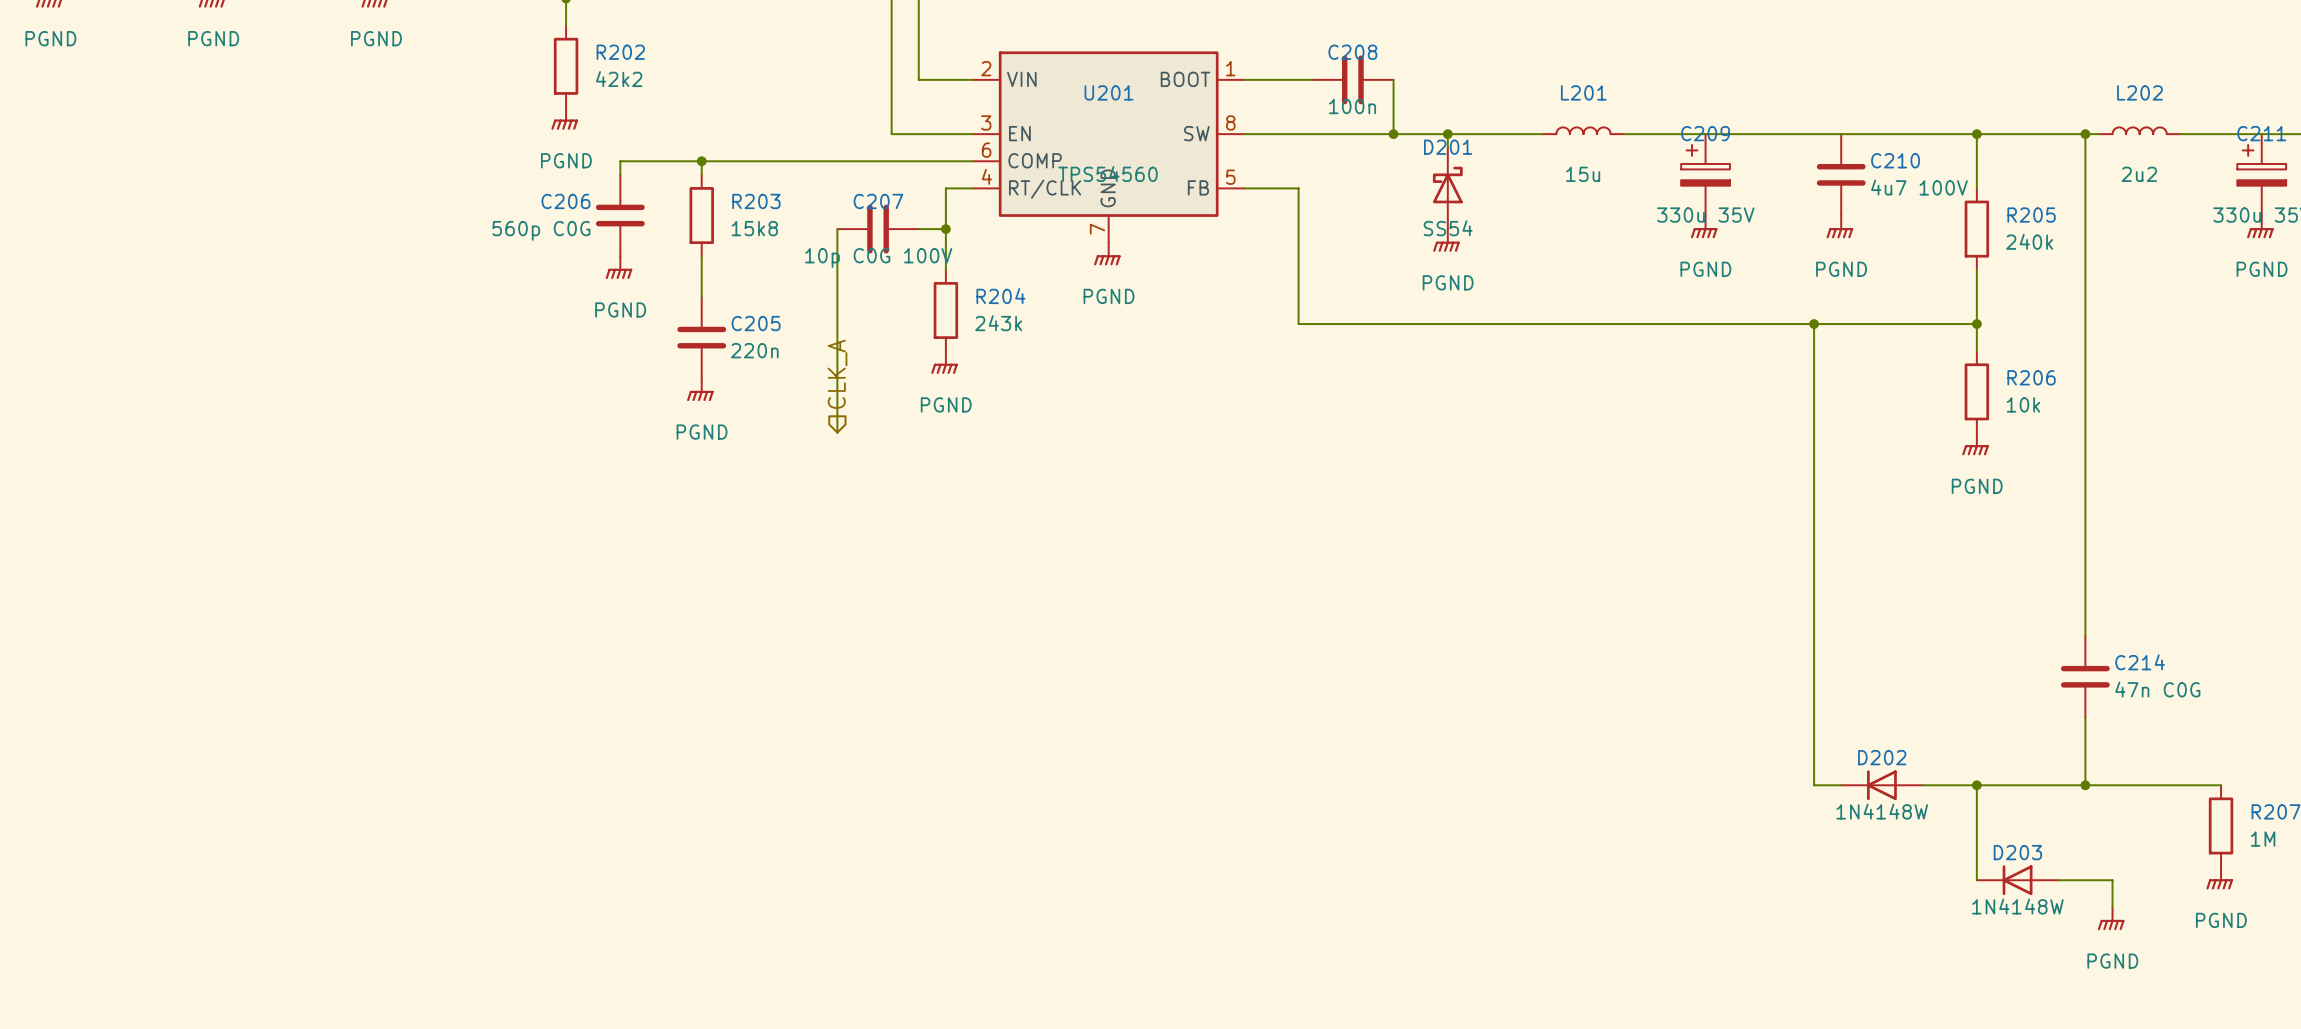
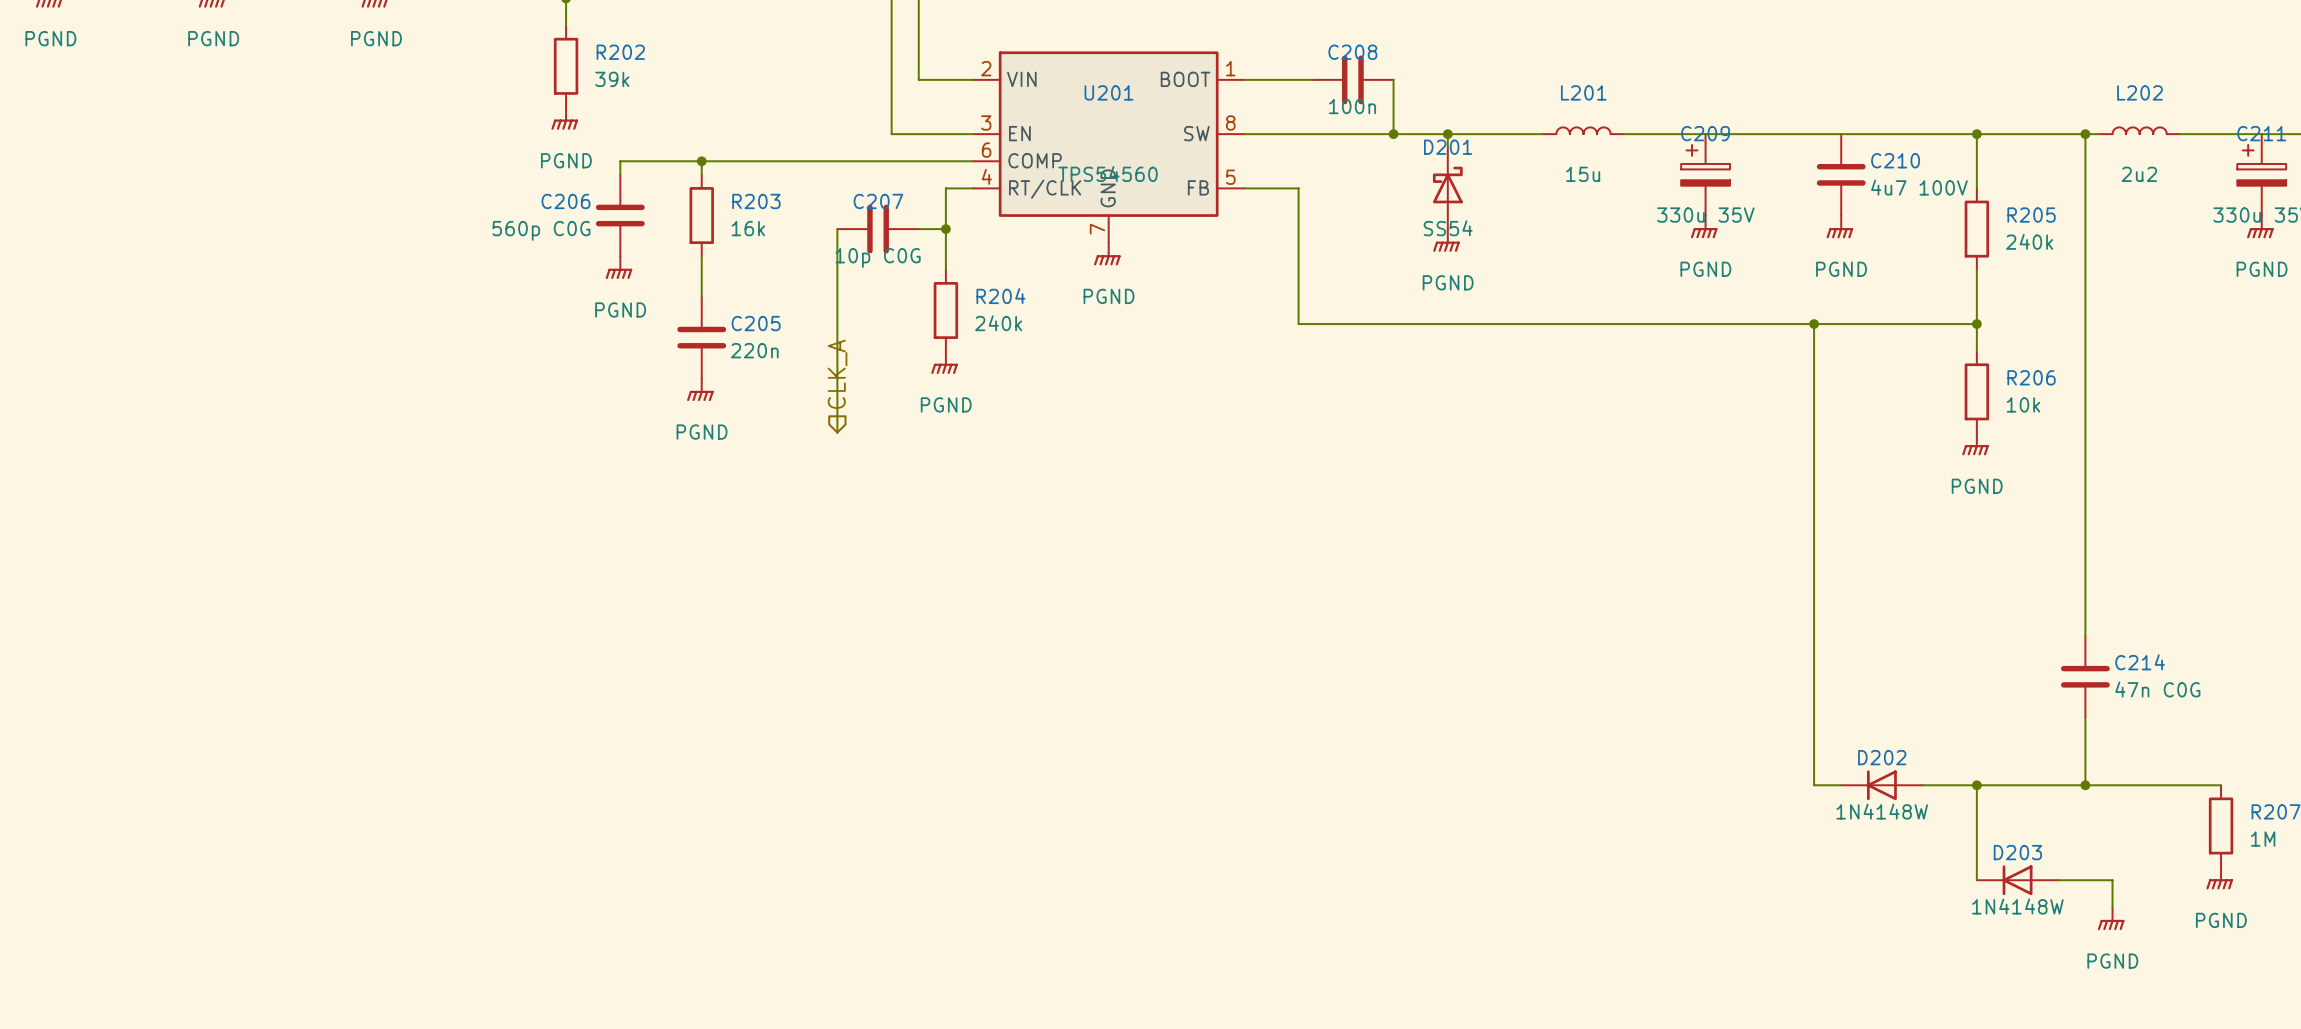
R202 value: 42k2 (619, 79) -> 39k (612, 79)
R203 value: 15k8 (754, 228) -> 16k (748, 228)
C207 value: 10p C0G 100V (878, 257) -> 10p C0G (878, 257)
R204 value: 243k (998, 323) -> 240k (998, 323)

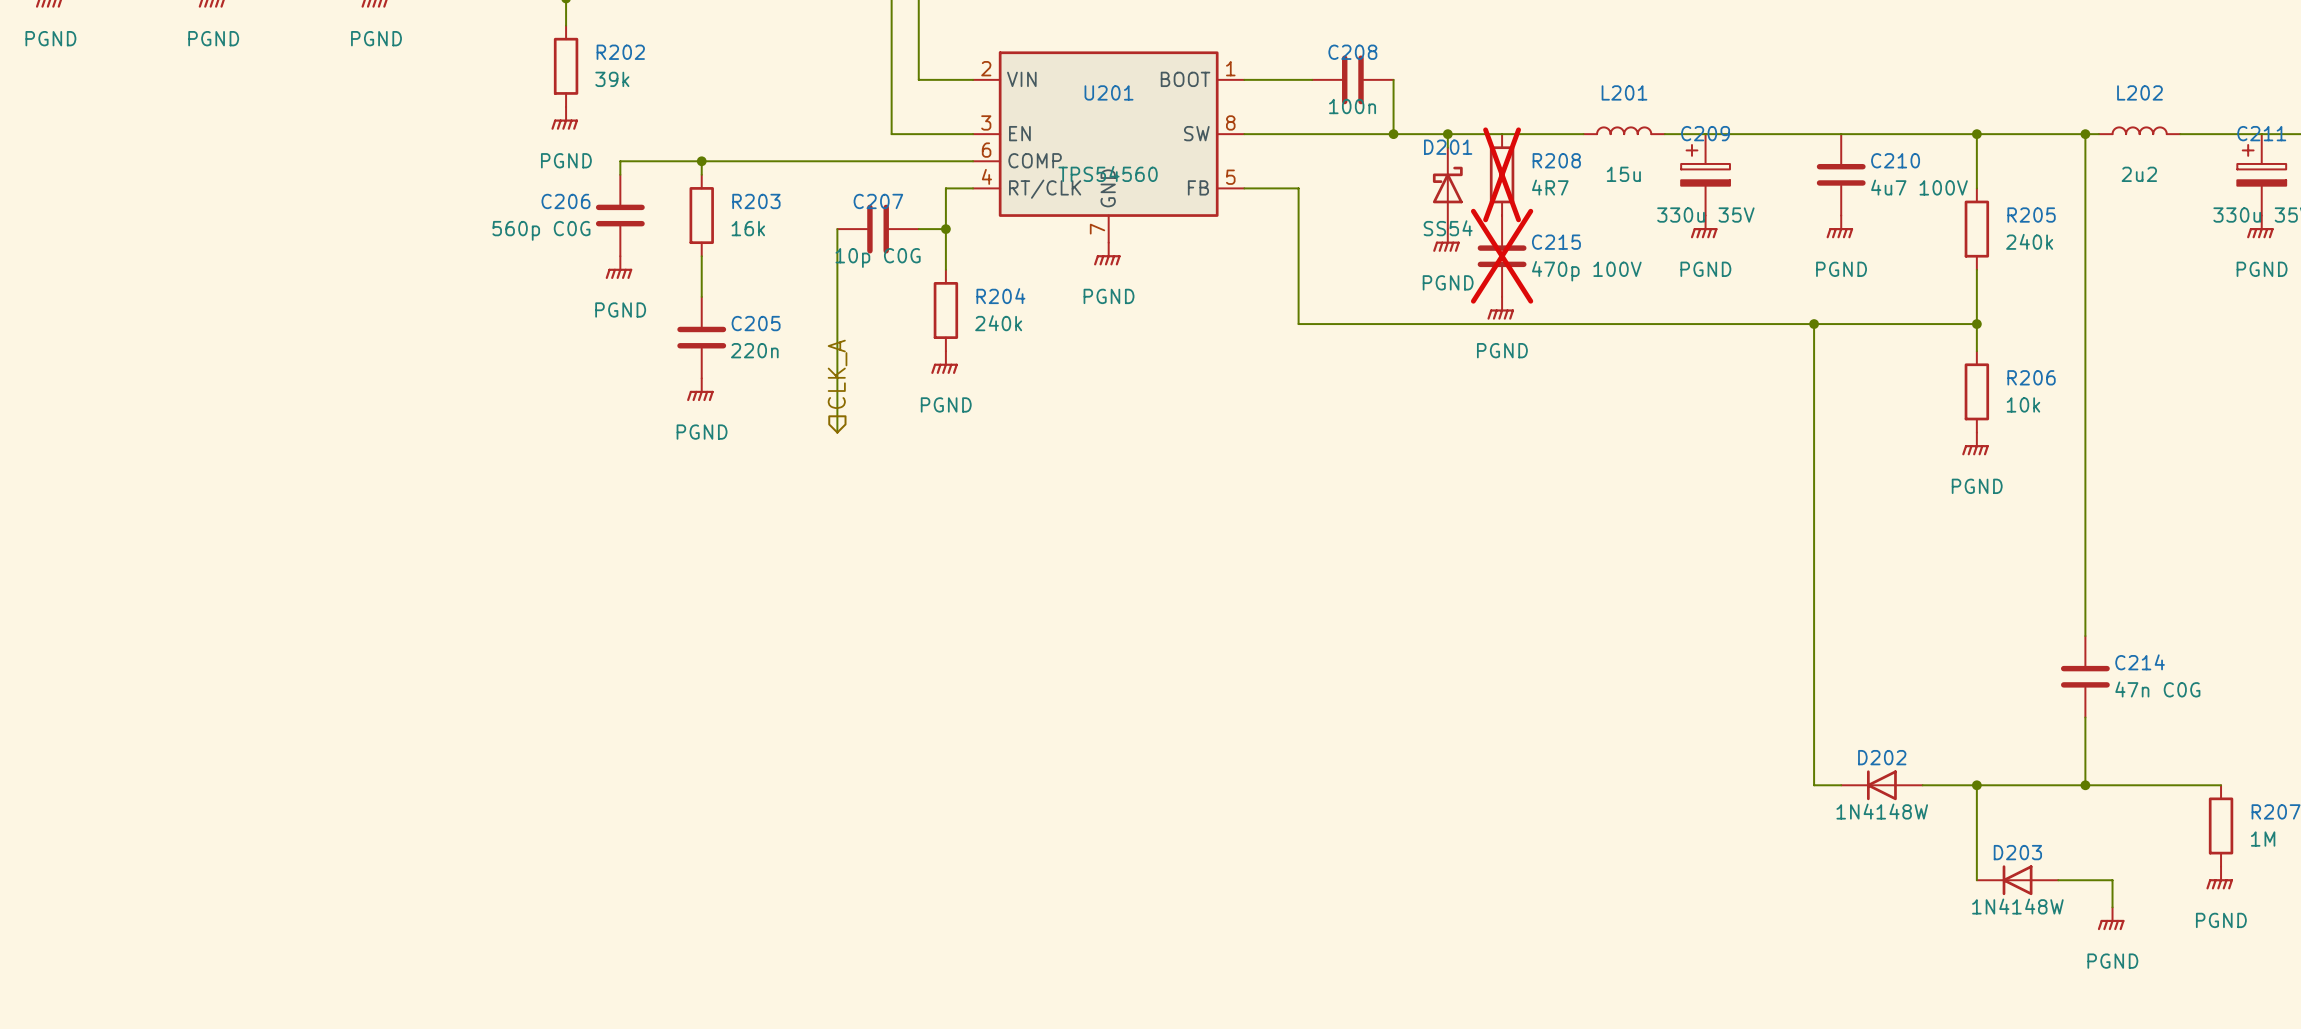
L201 position: (1583, 130) -> (1624, 130)
wire: (1624, 134) (1664, 134) -> (1542, 134) (1583, 134)
R208: none -> 4R7 (1502, 174)
C215: none -> 470p 100V (1502, 256)
power symbol: none -> PGND (1500, 308)

